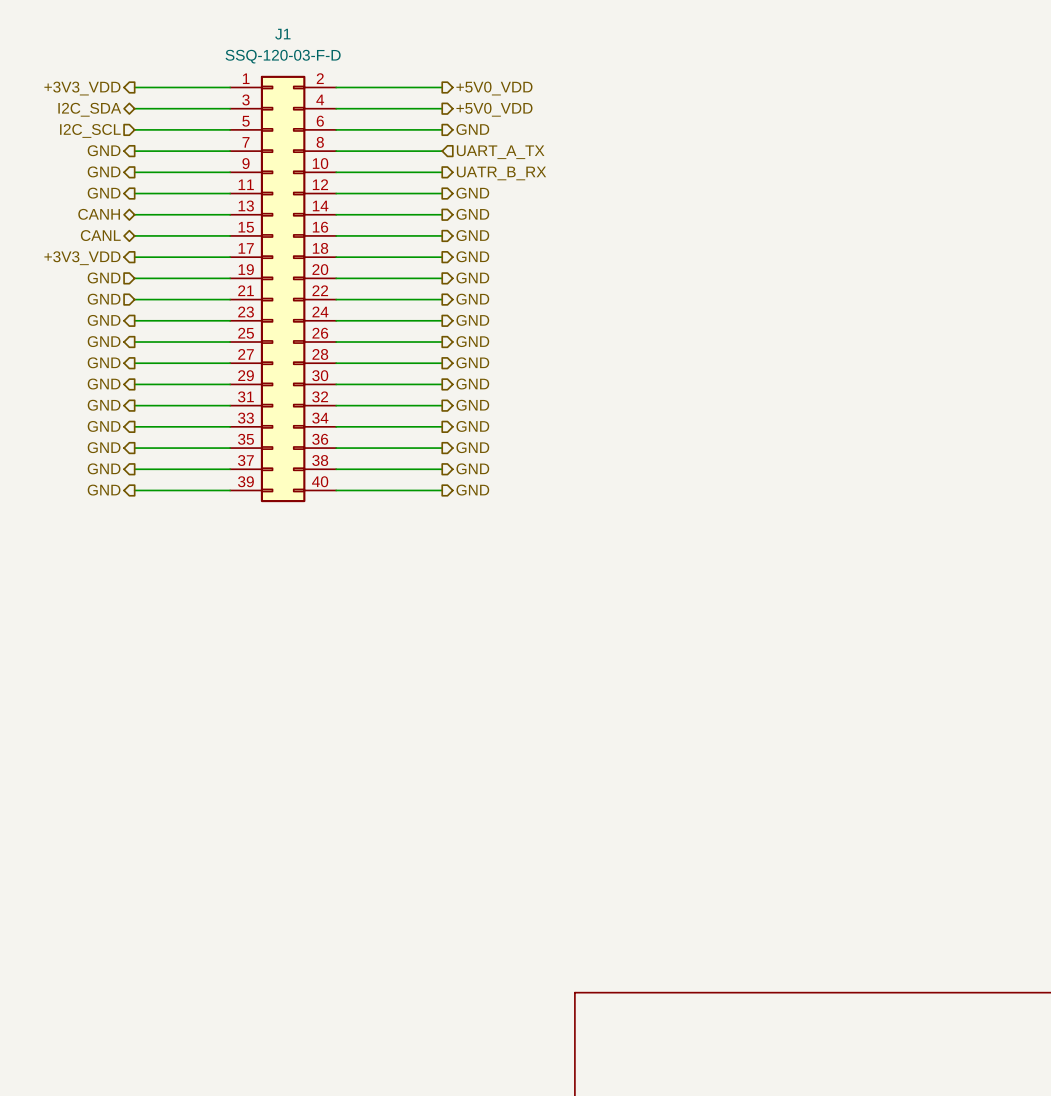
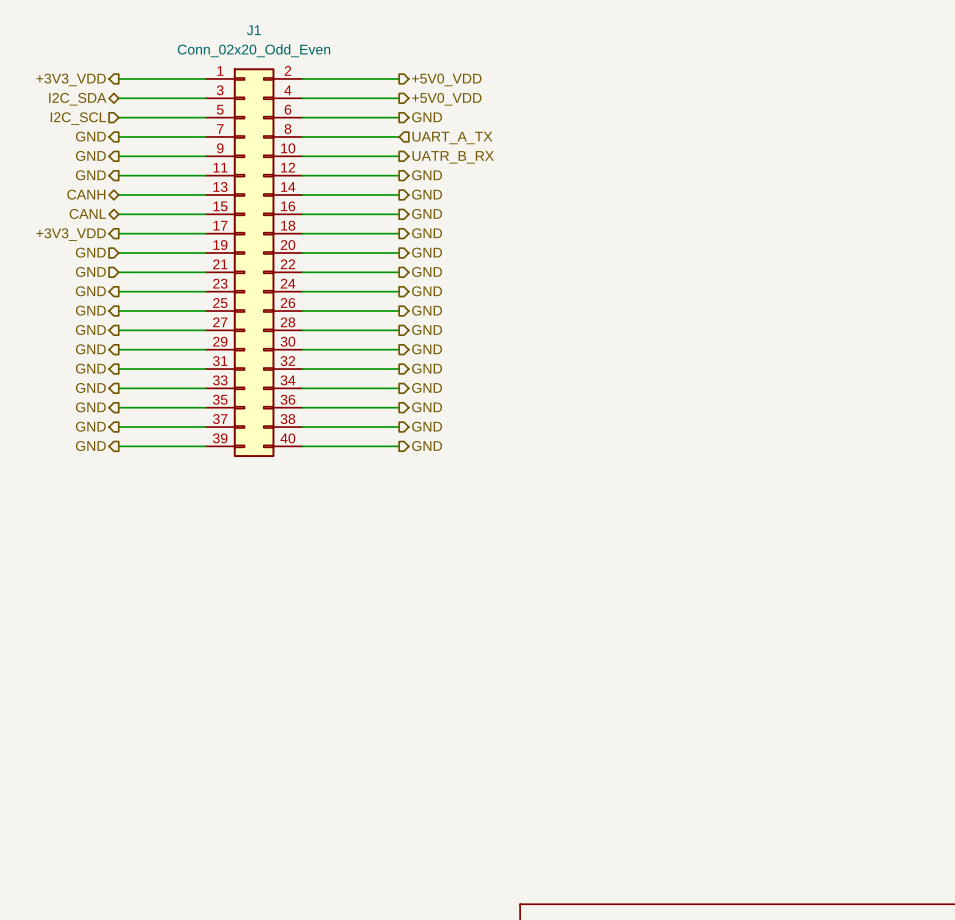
J1 value: SSQ-120-03-F-D (283, 56) -> Conn_02x20_Odd_Even (254, 50)

